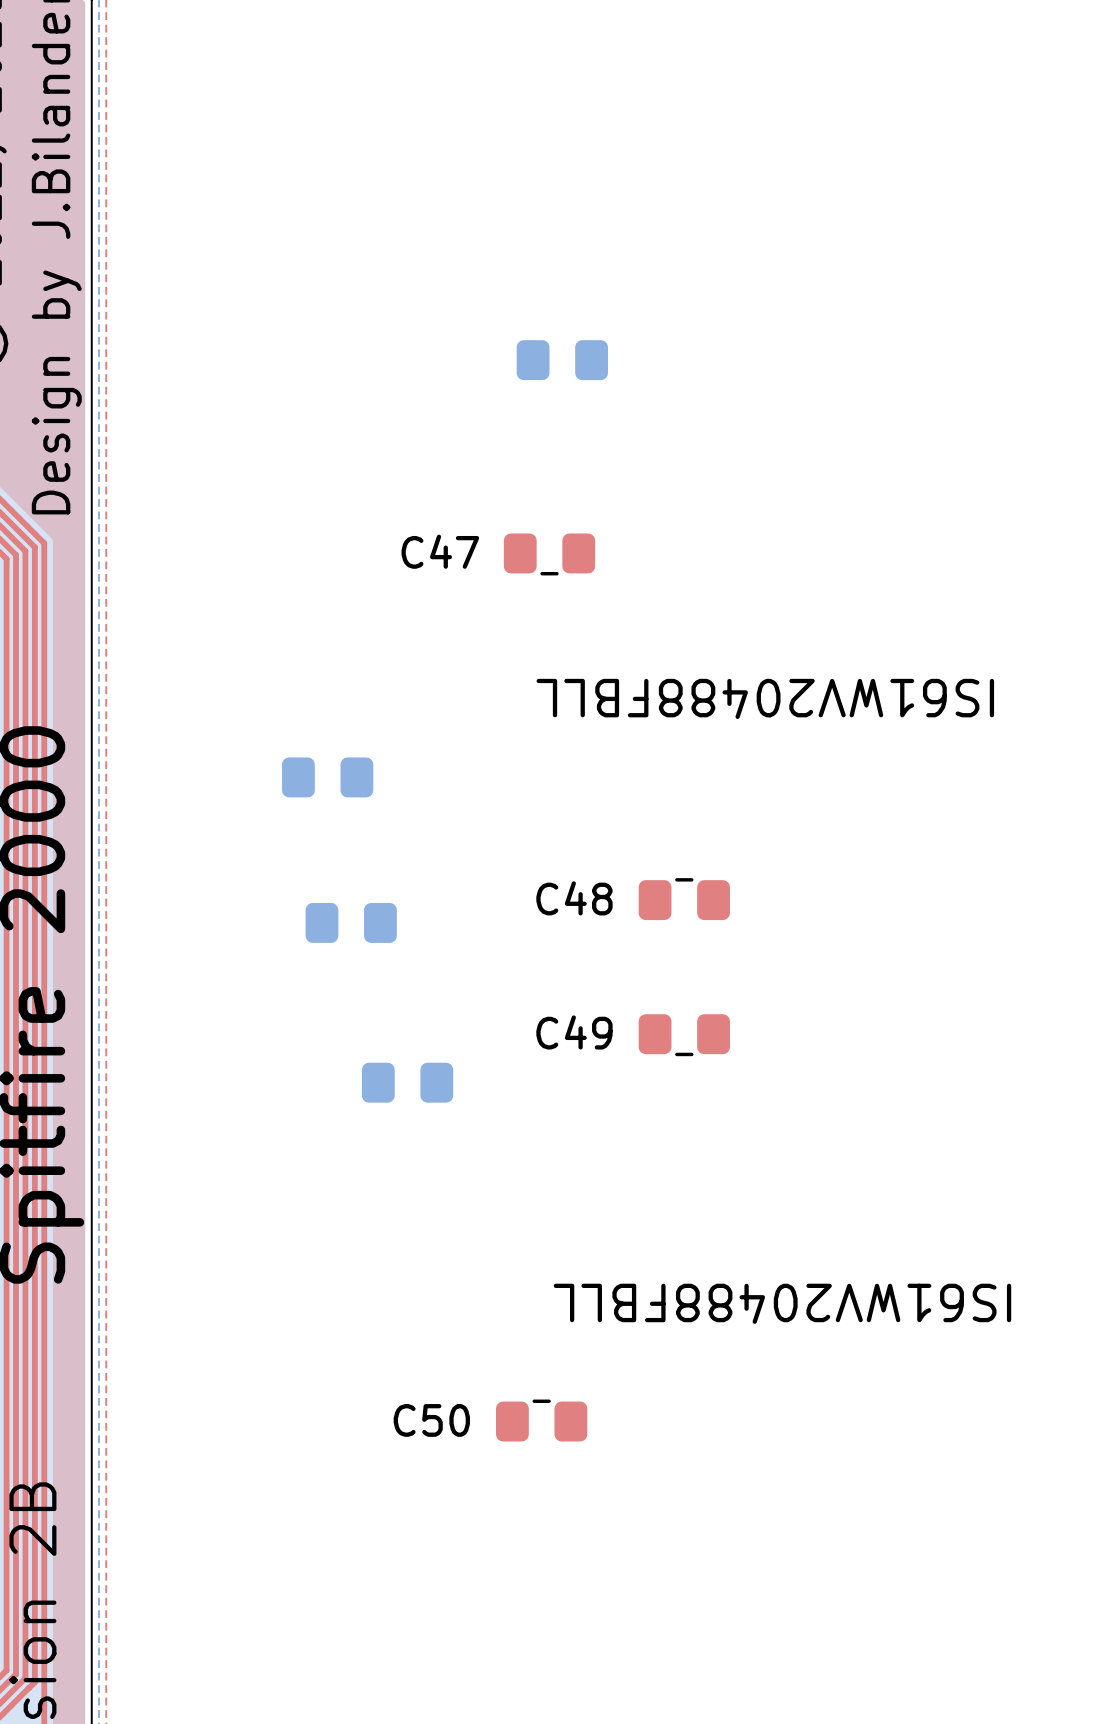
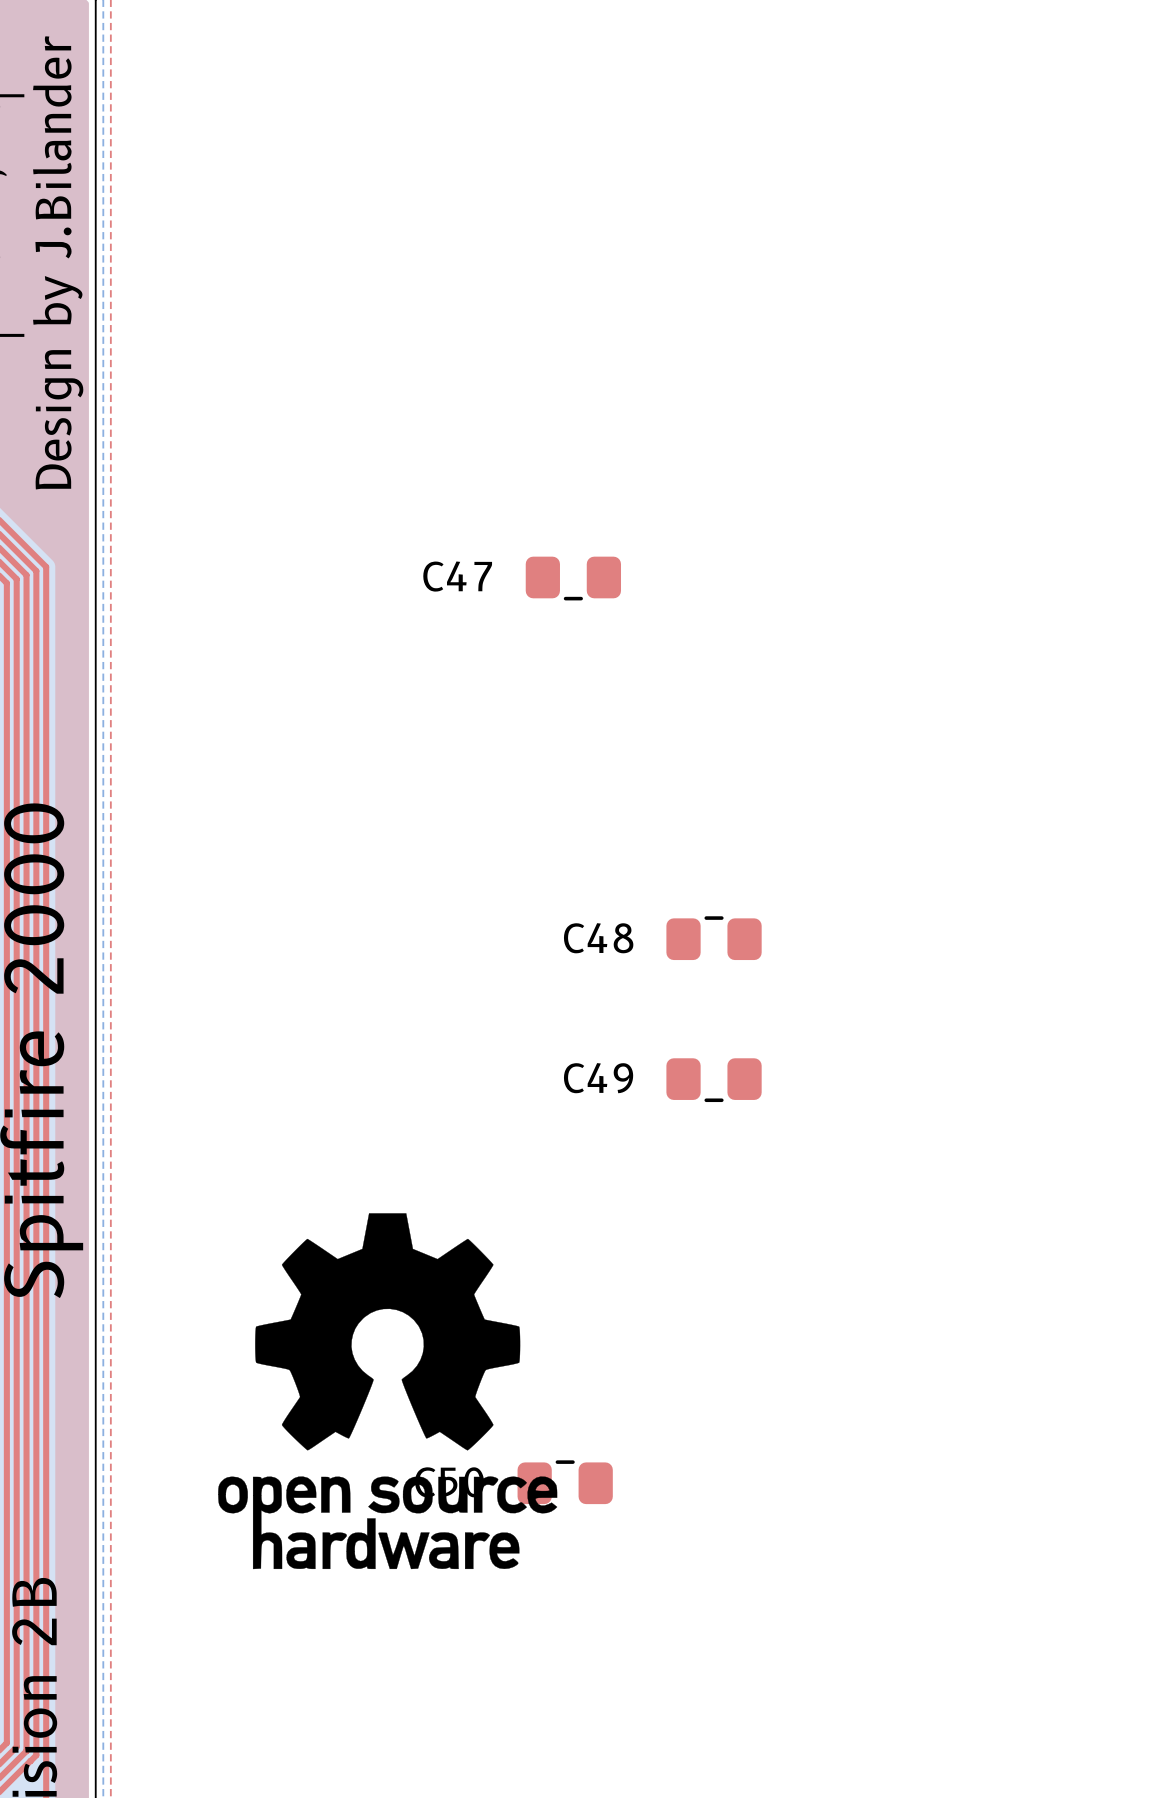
part: (562, 360) -> none
text: IS61WV20488FBLL (765, 698) -> none
part: (327, 777) -> none
part: (351, 922) -> none
part: (407, 1082) -> none
drawing: none -> [218, 1213, 558, 1570]
text: IS61WV20488FBLL (782, 1303) -> none

